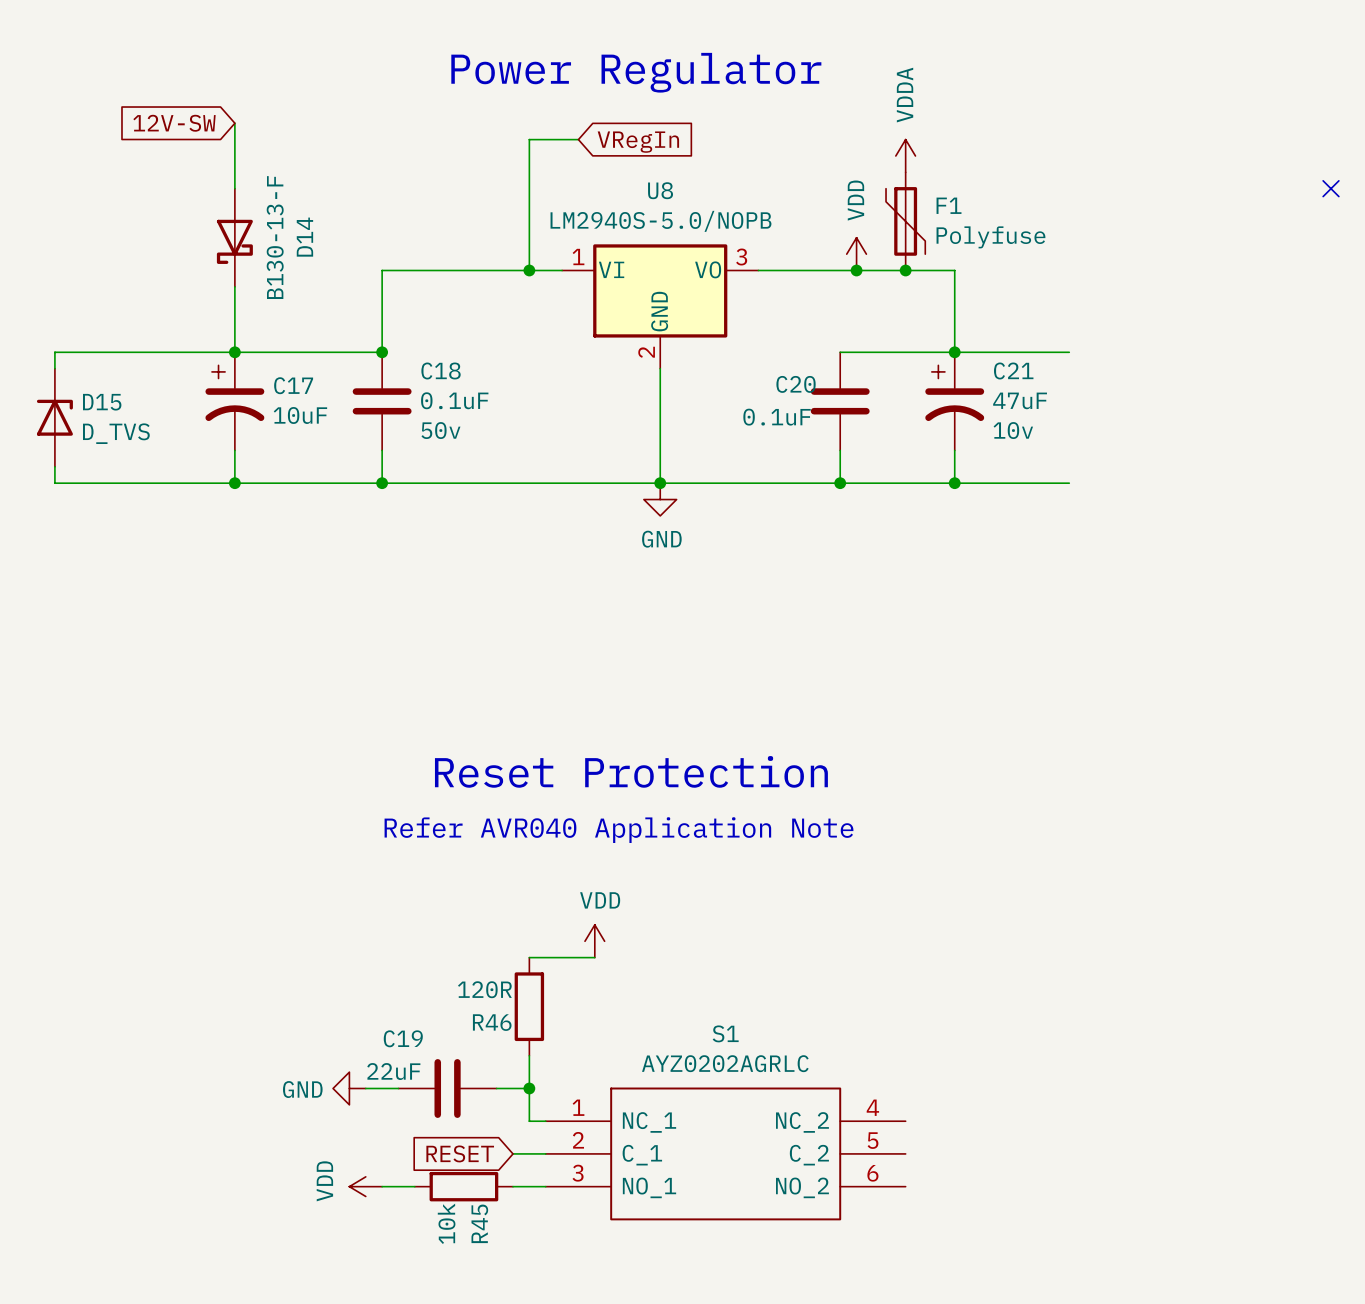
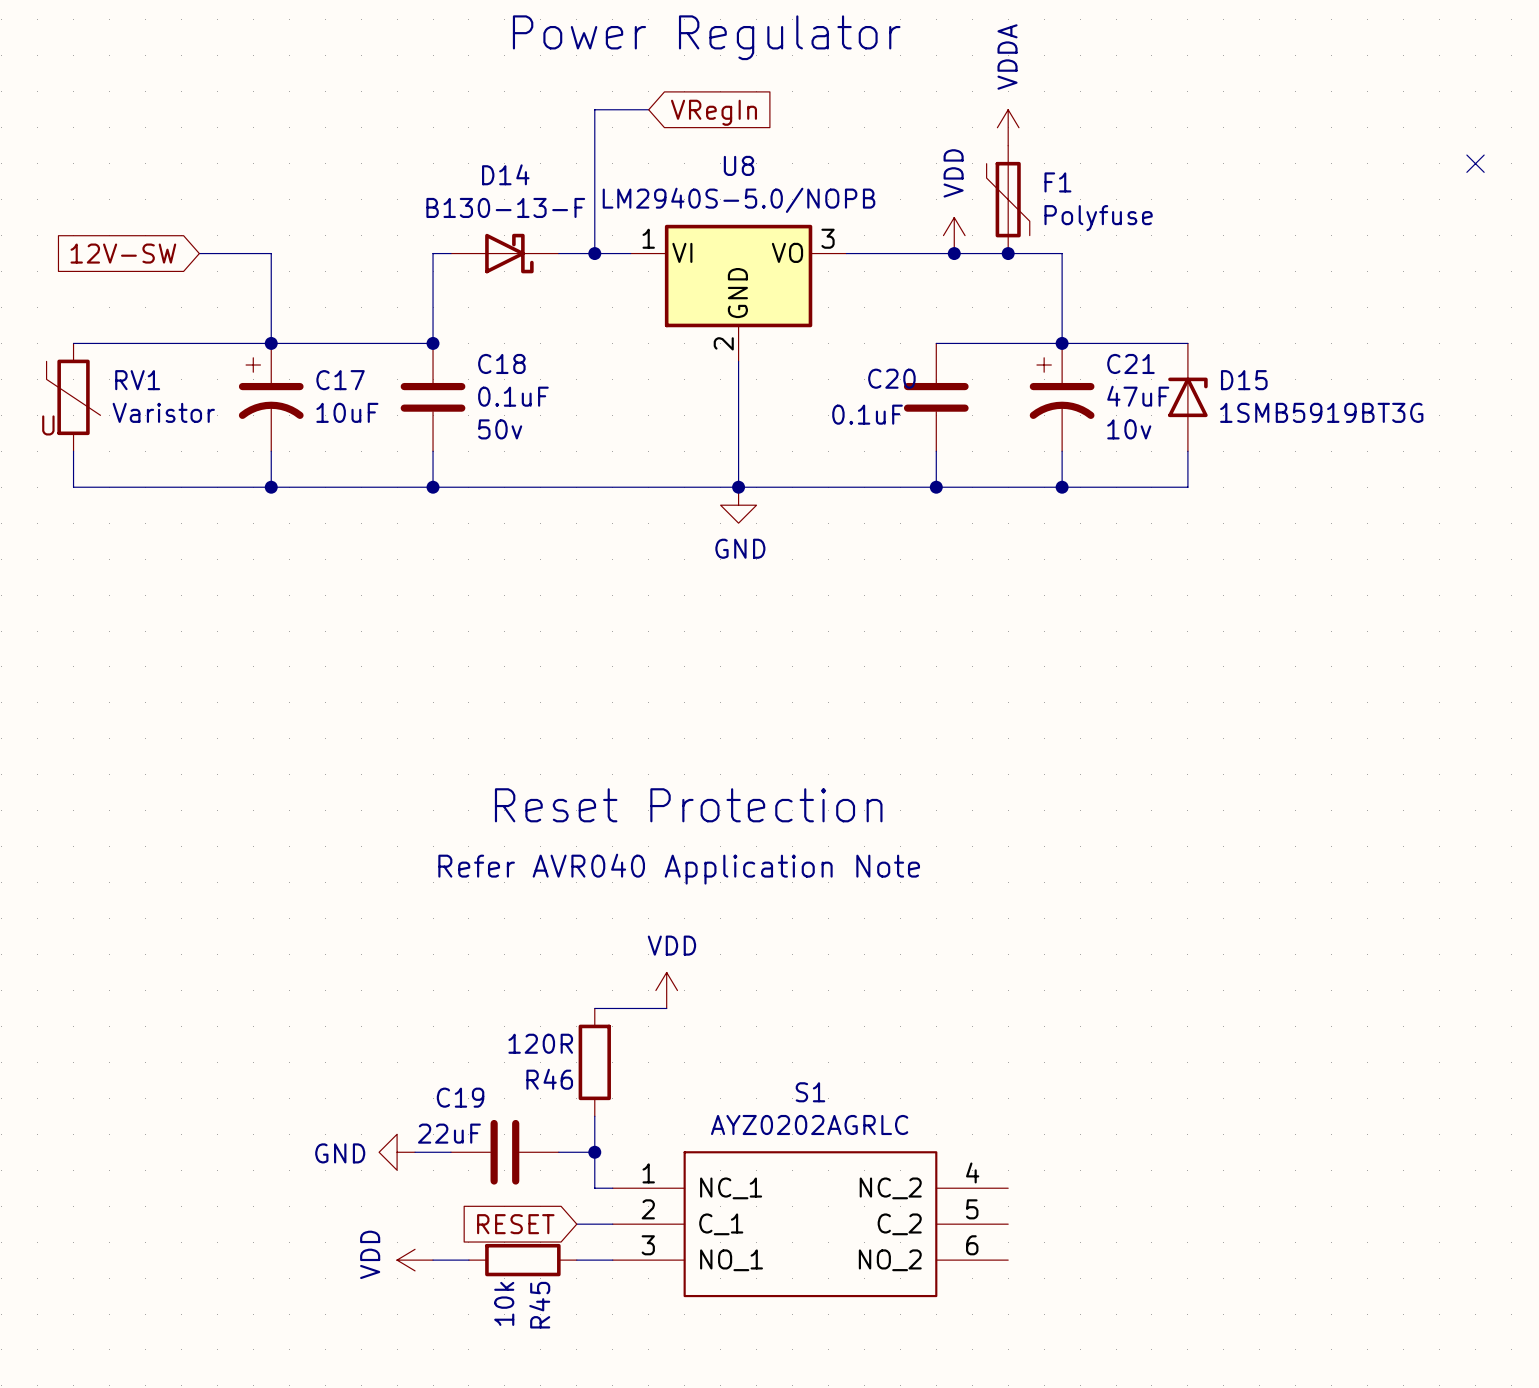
global label position: 12V-SW (174, 123) -> 12V-SW (123, 253)
wire: (234, 123) (234, 188) -> none
D14 position: (234, 237) -> (504, 253)
D14 rotation: 0° (234, 241) -> 90° counterclockwise (509, 253)
wire: none -> (199, 253) (271, 253) (271, 271)
RV1: none -> Varistor (73, 397)
D15 position: (54, 417) -> (1187, 397)
D15 value: D_TVS (116, 433) -> 1SMB5919BT3G (1321, 412)
wire: none -> (1187, 451) (1187, 487)

